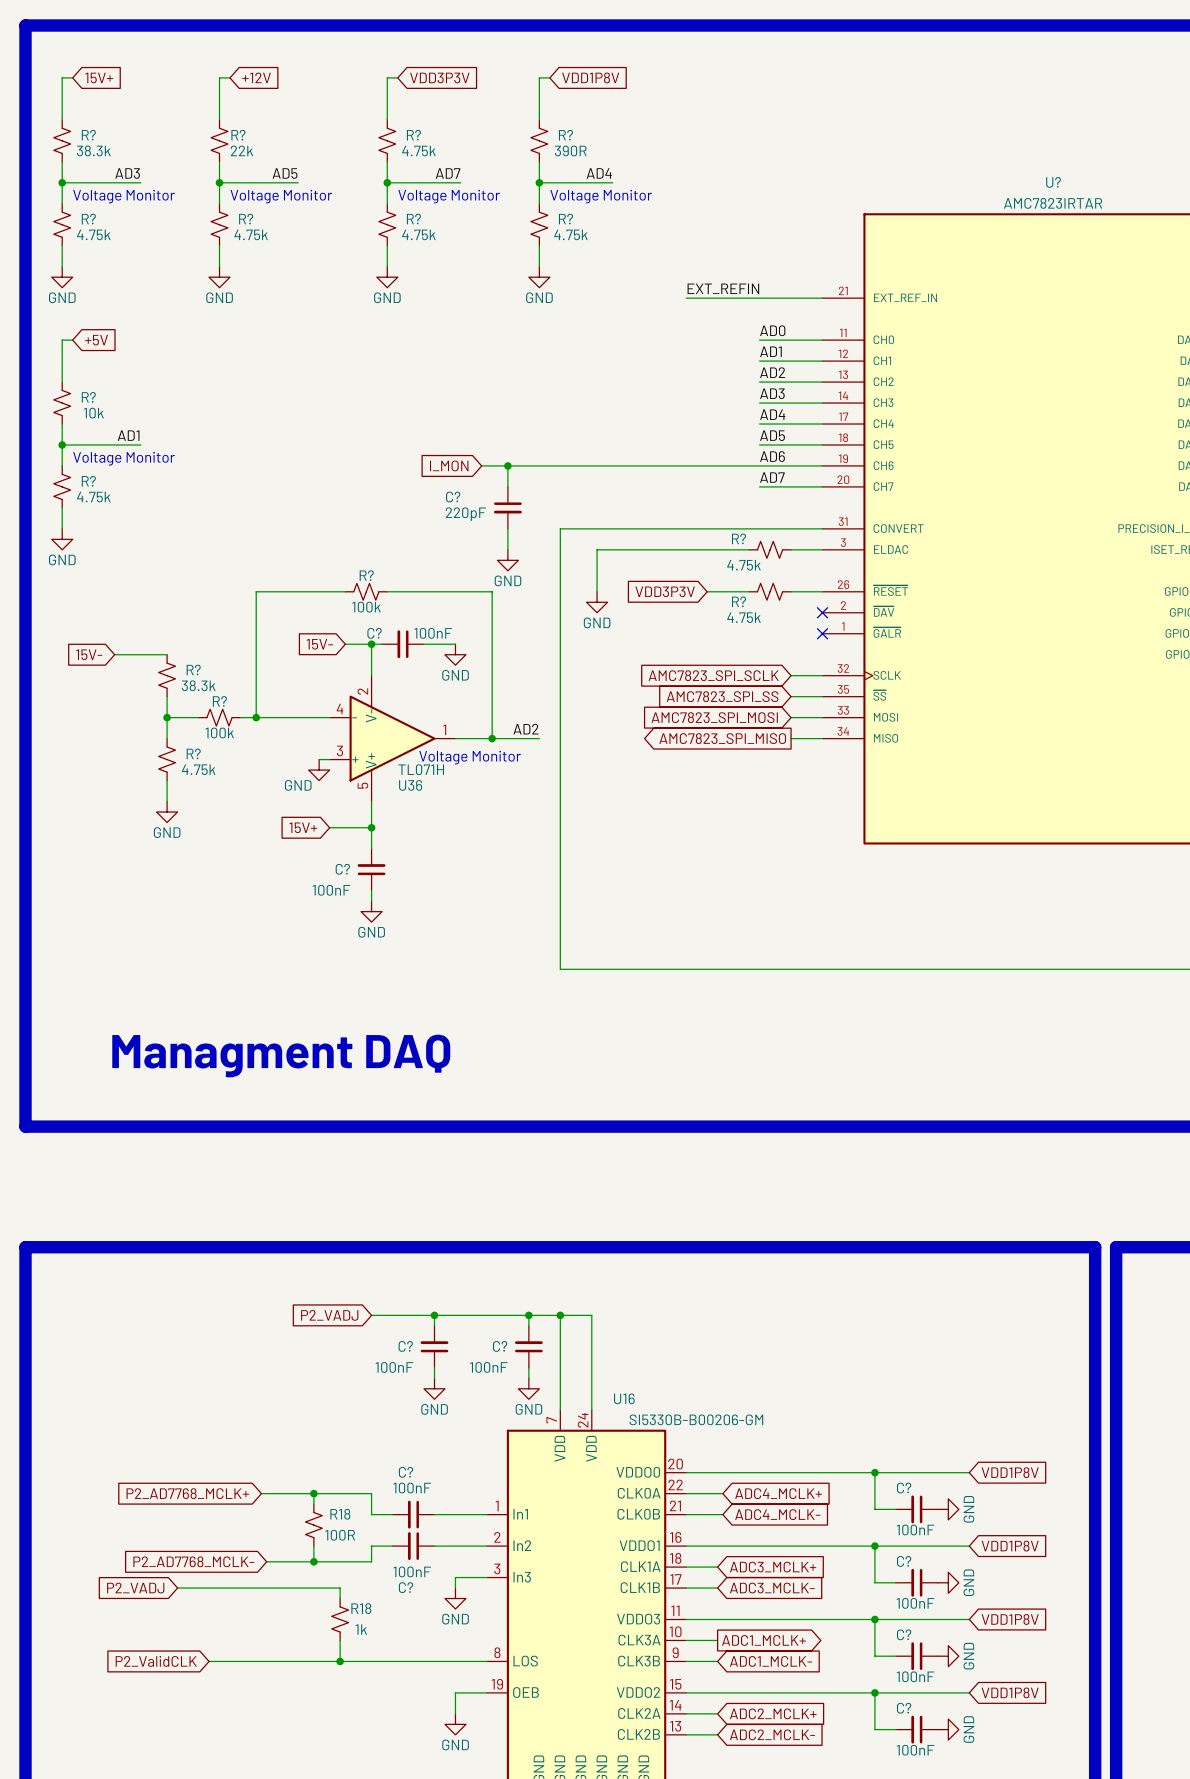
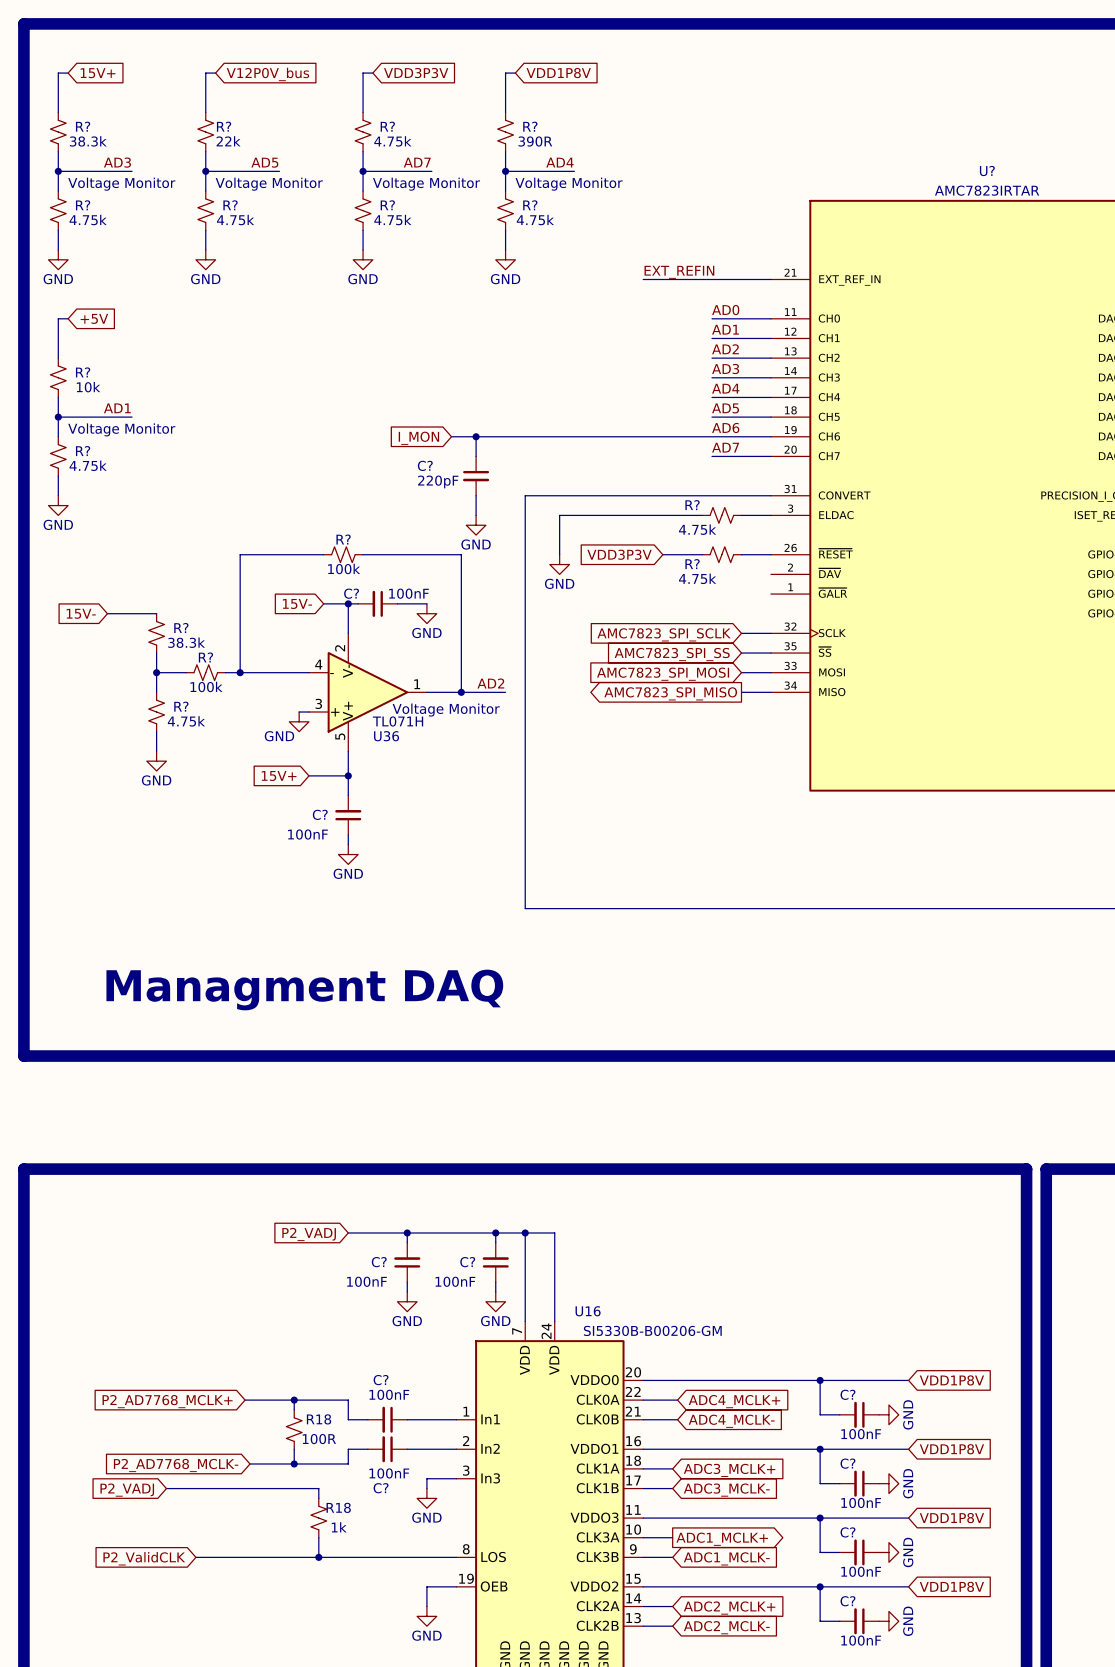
global label: +12V (256, 77) -> V12P0V_bus (267, 74)
no-connect mark: (822, 612) -> none
no-connect mark: (822, 633) -> none

